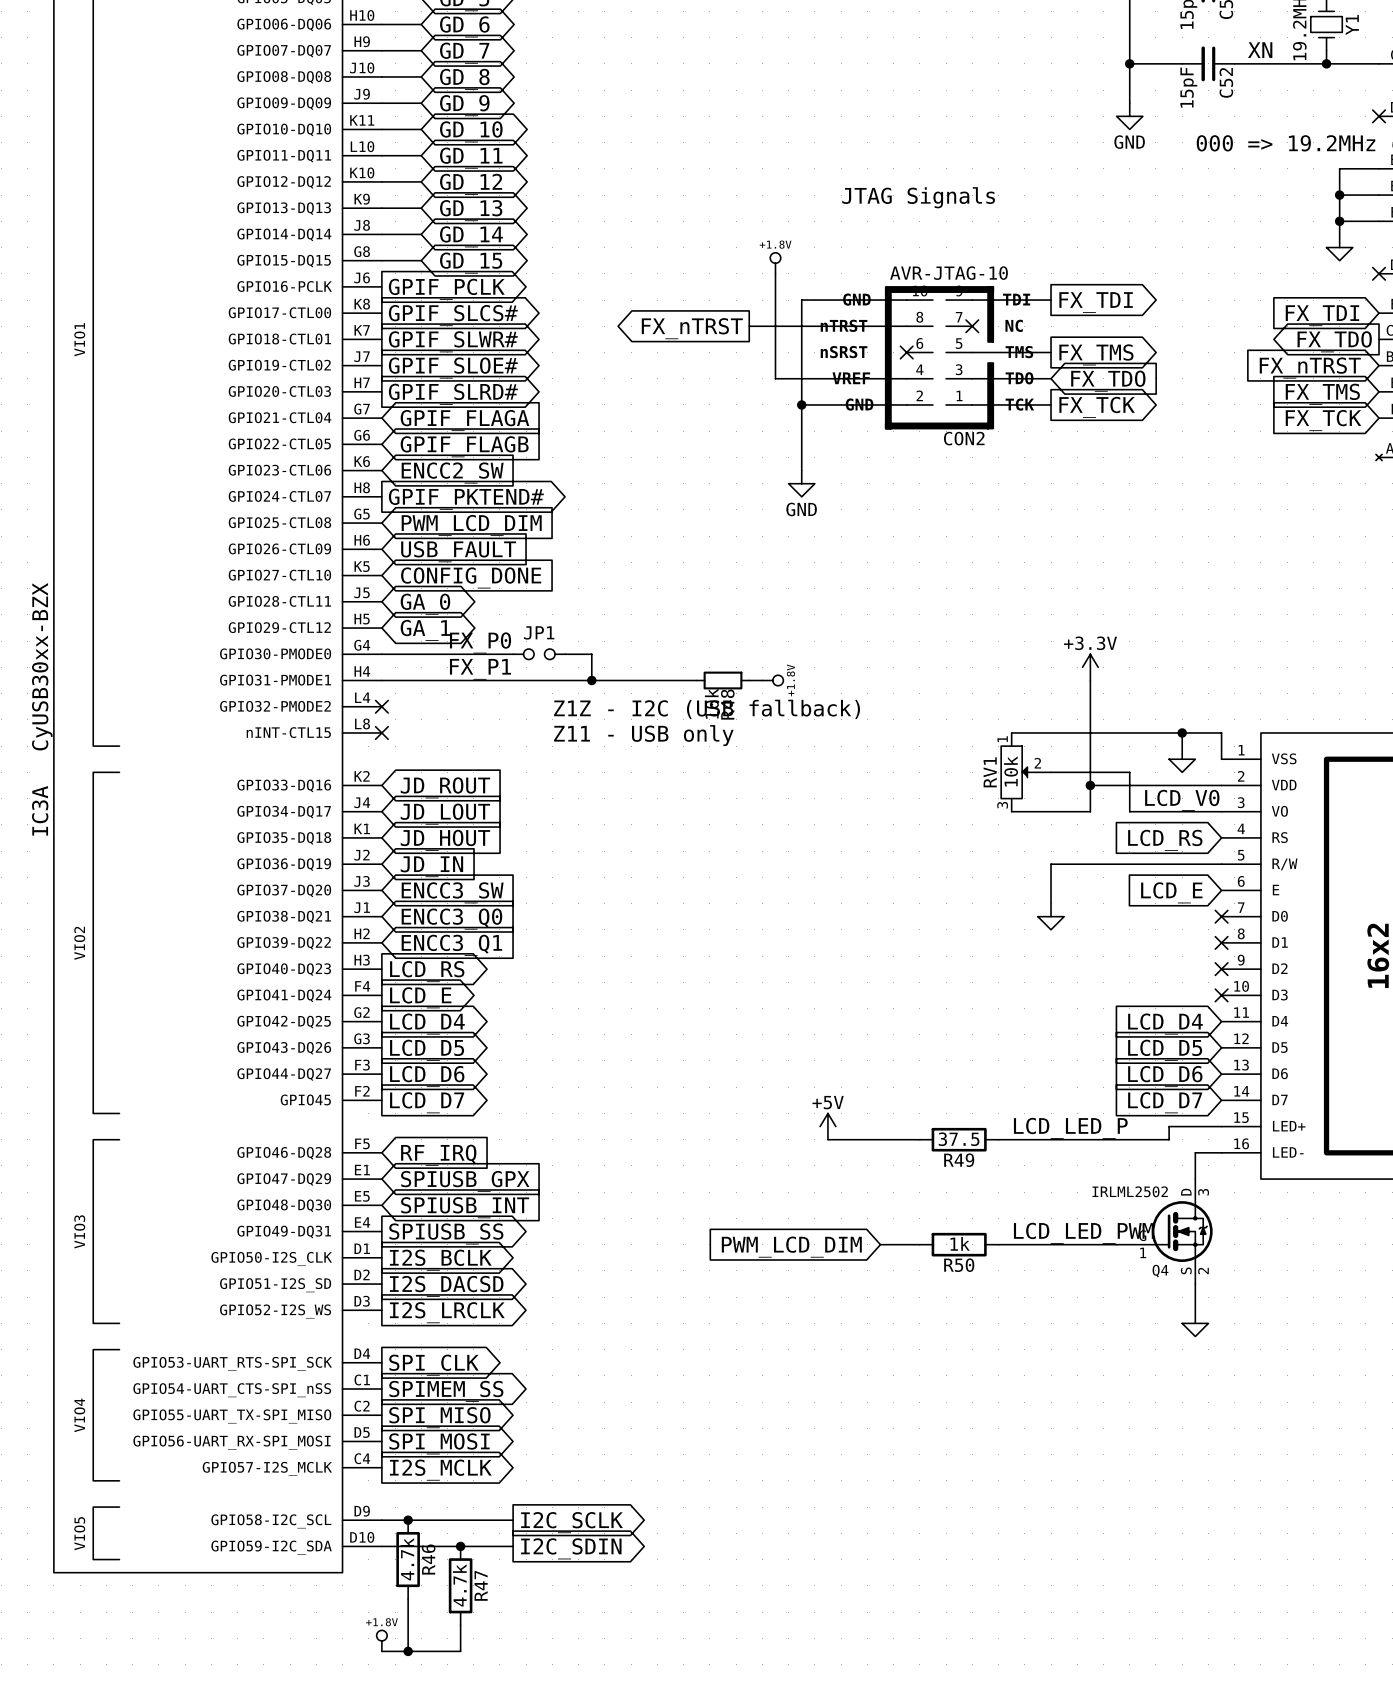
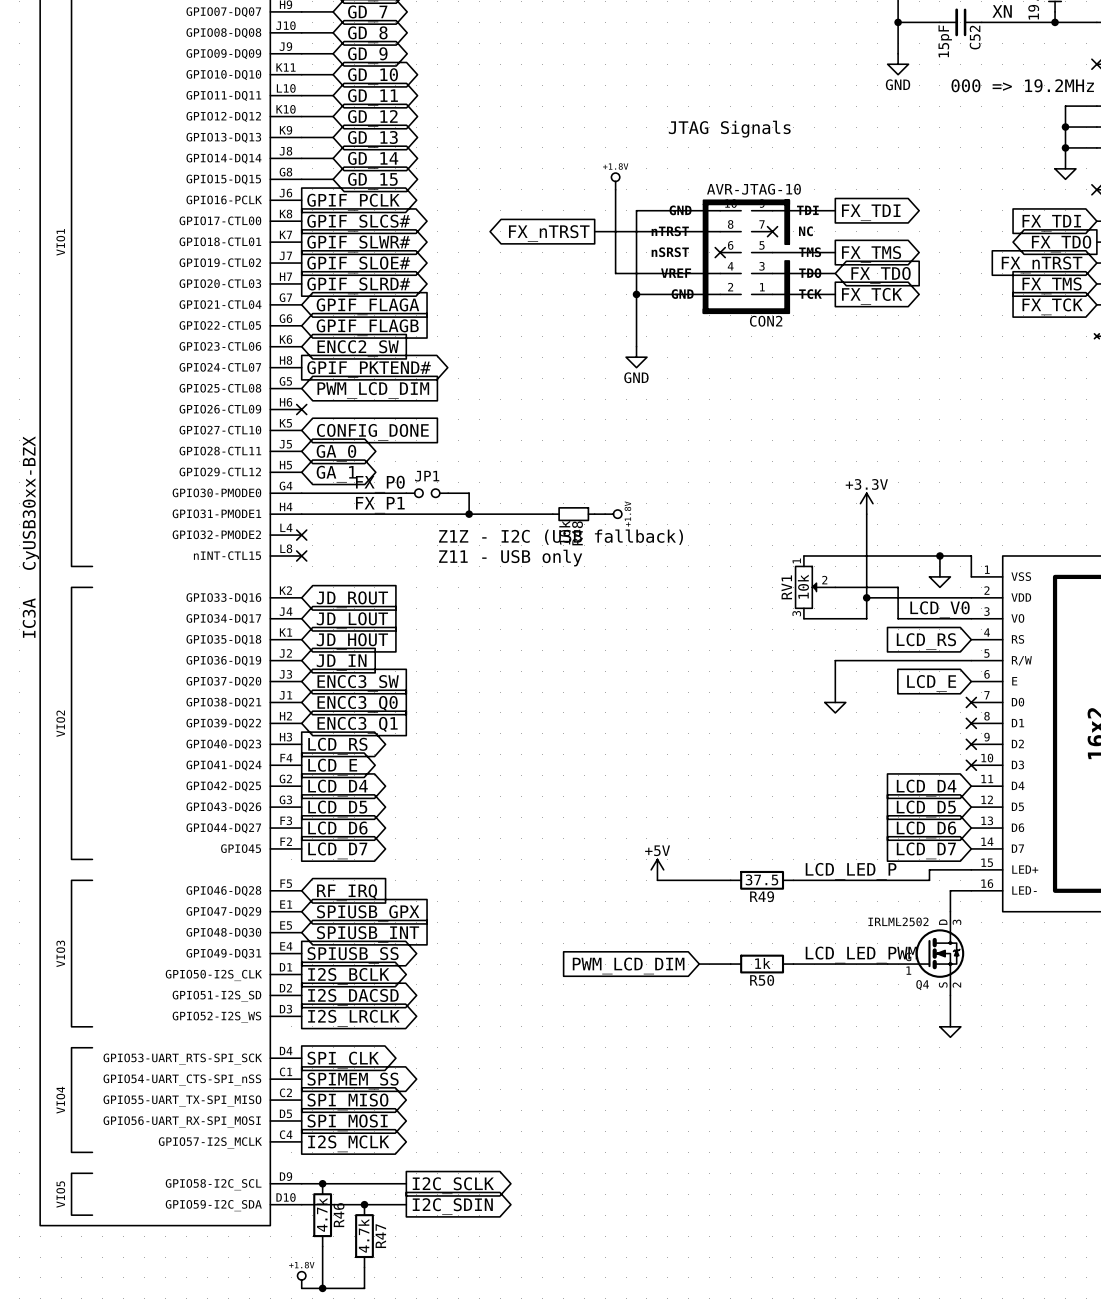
no-connect mark: none -> (301, 409)
global label: USB_FAULT (458, 551) -> none

